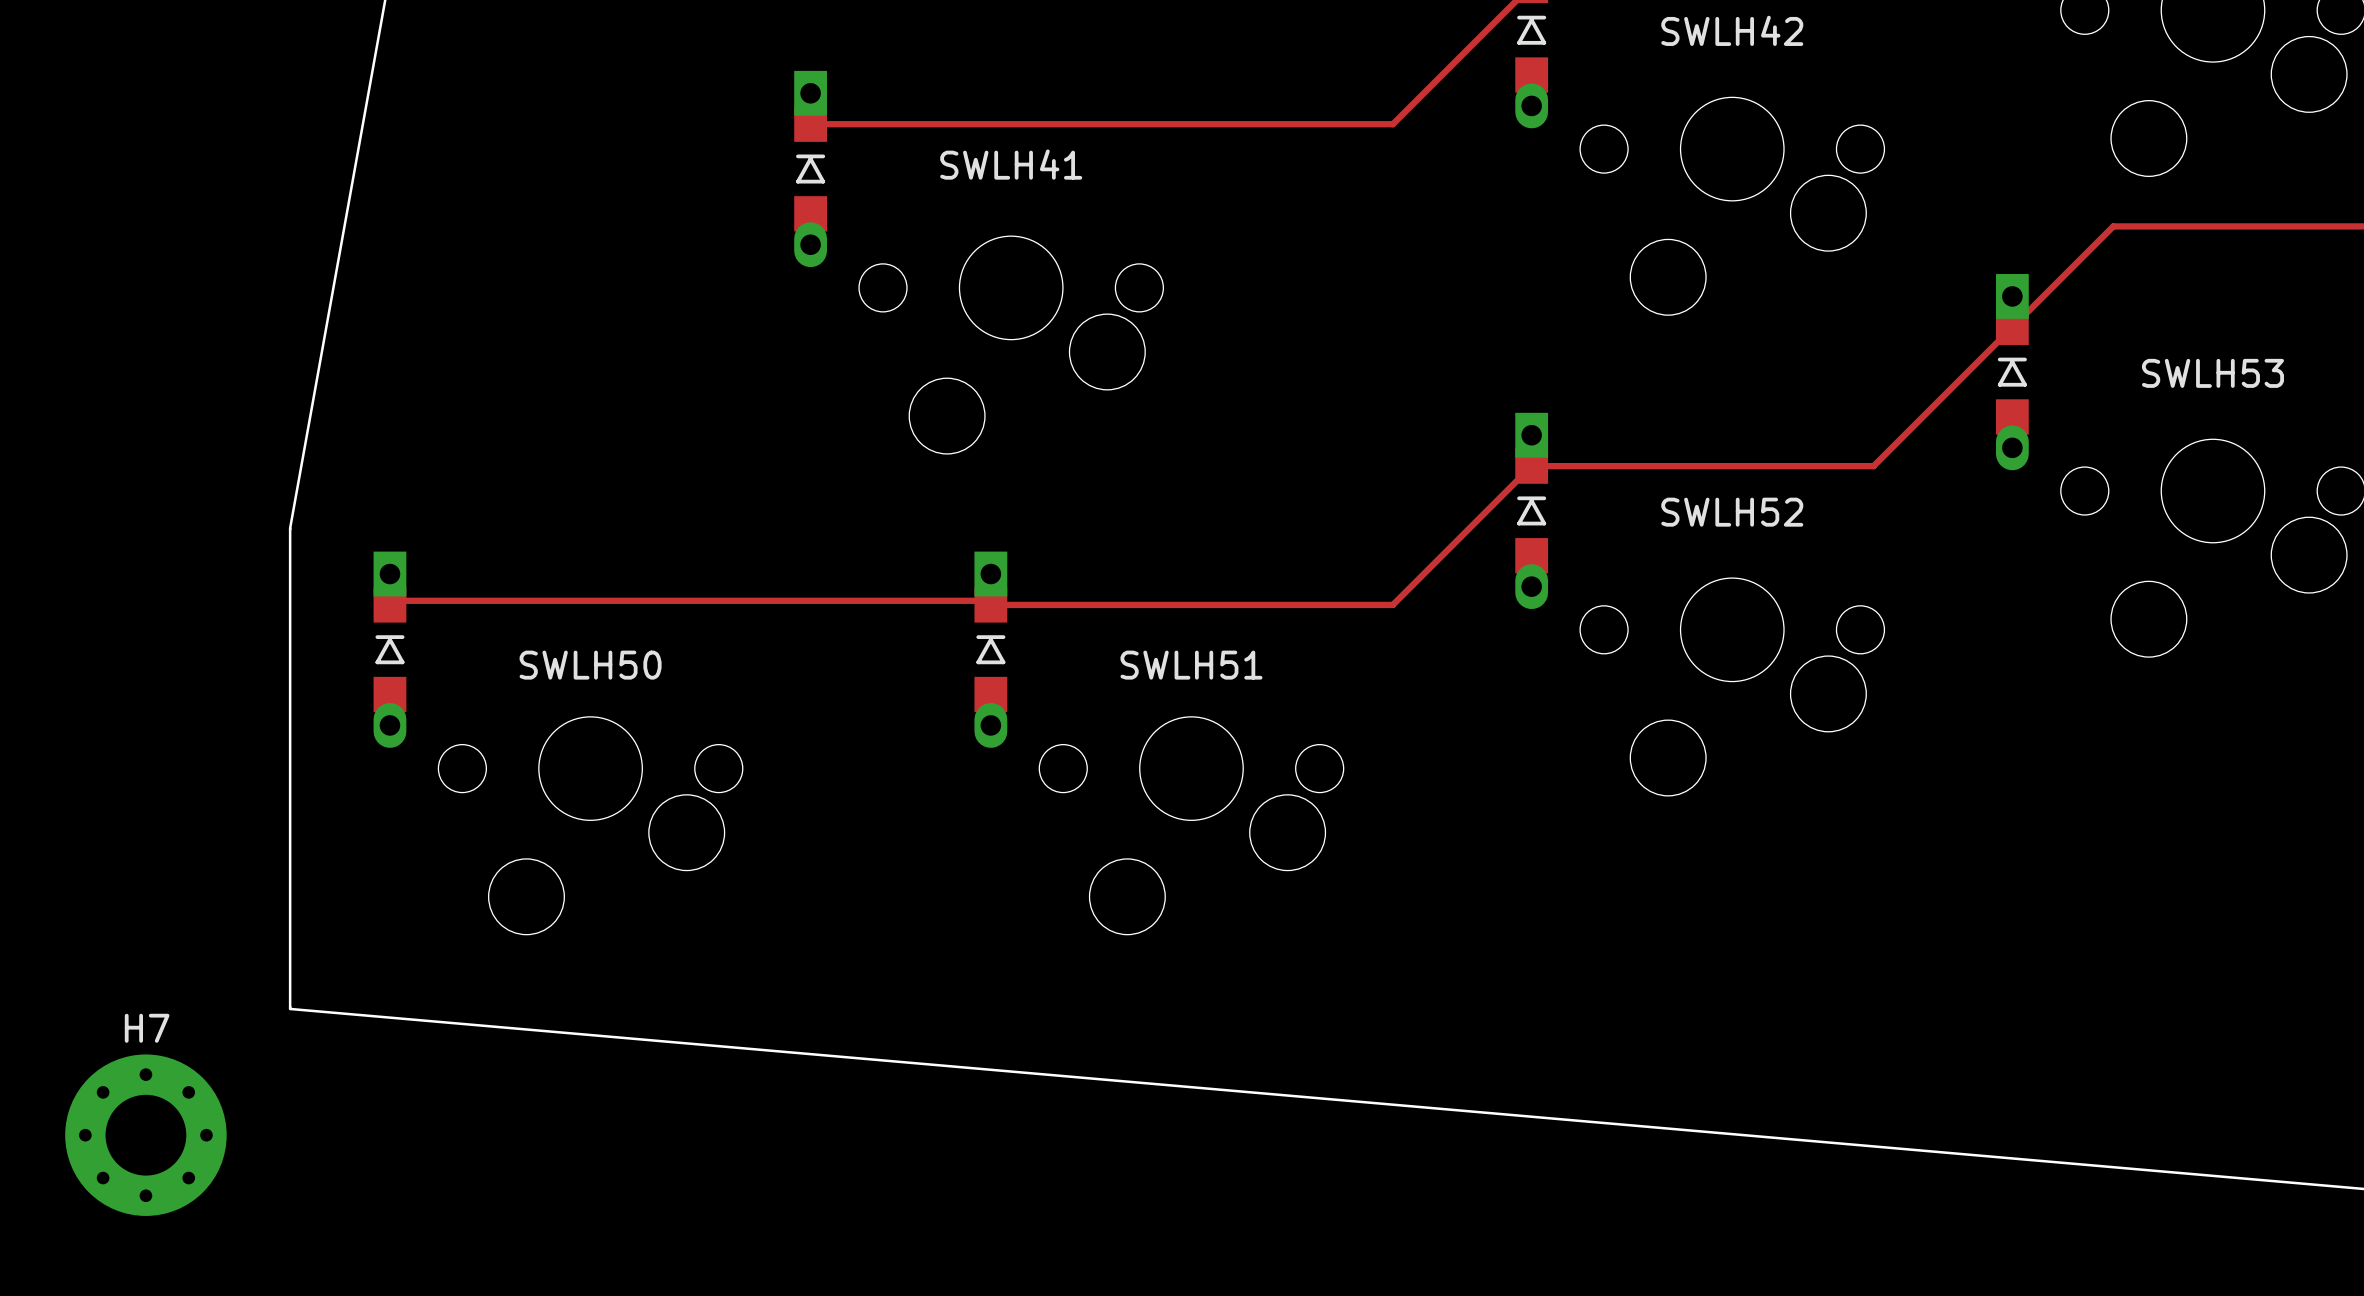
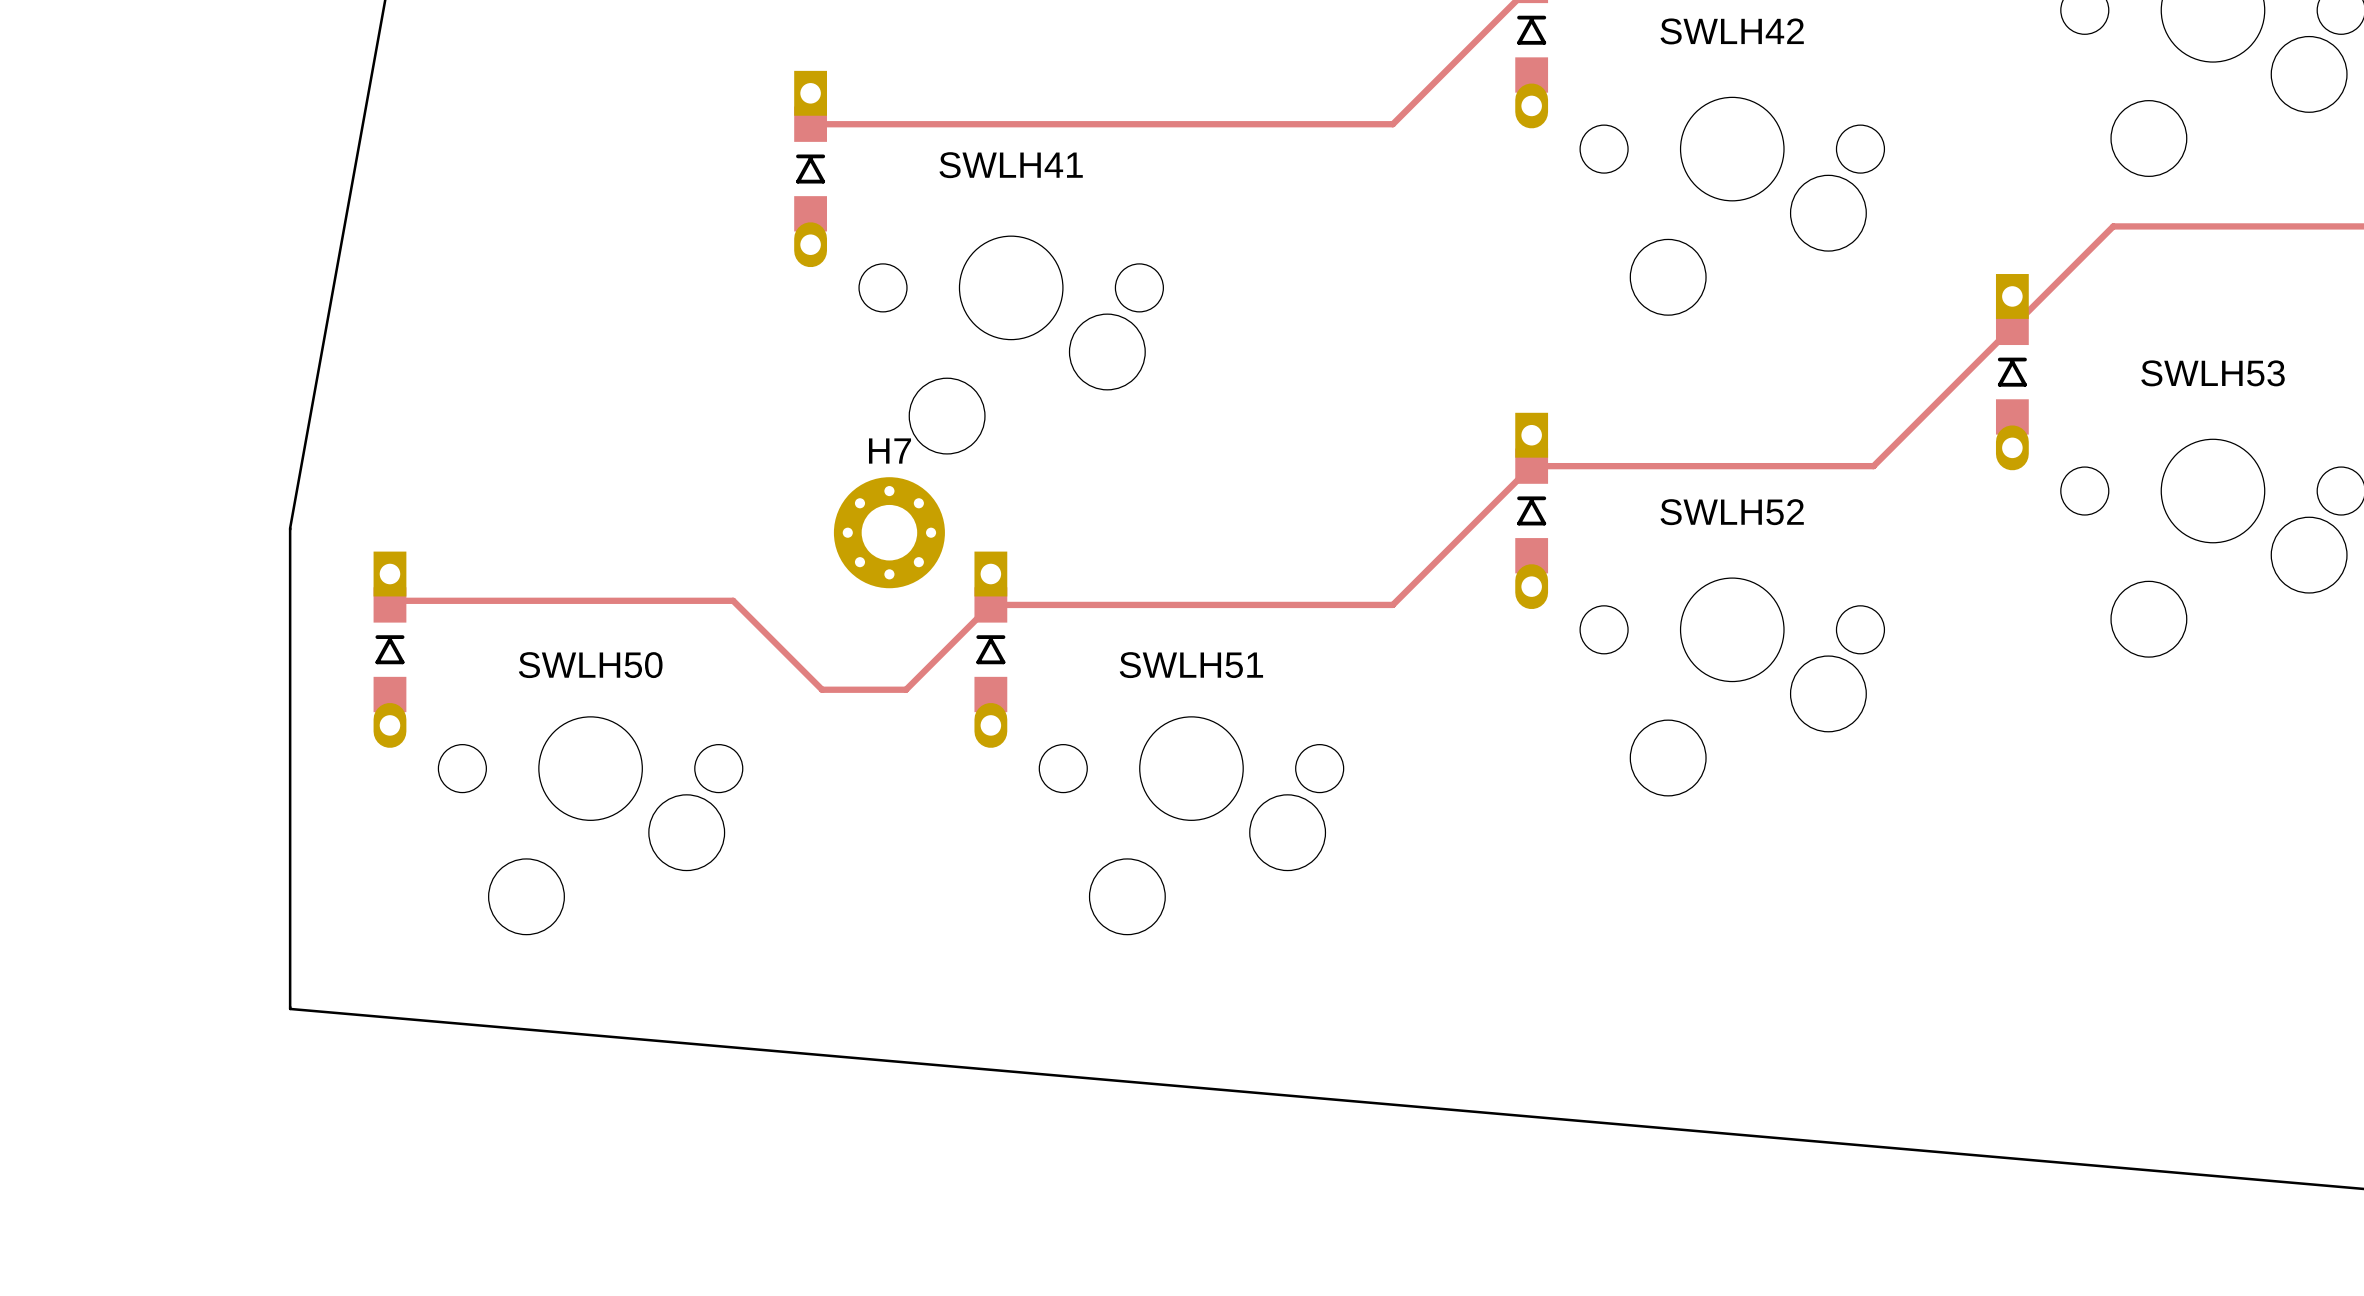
track: (733, 600) (986, 600) (990, 604) -> (733, 600) (822, 689) (906, 689) (990, 604)
H7 footprint: [65, 1054, 227, 1216] -> [833, 477, 945, 589]

